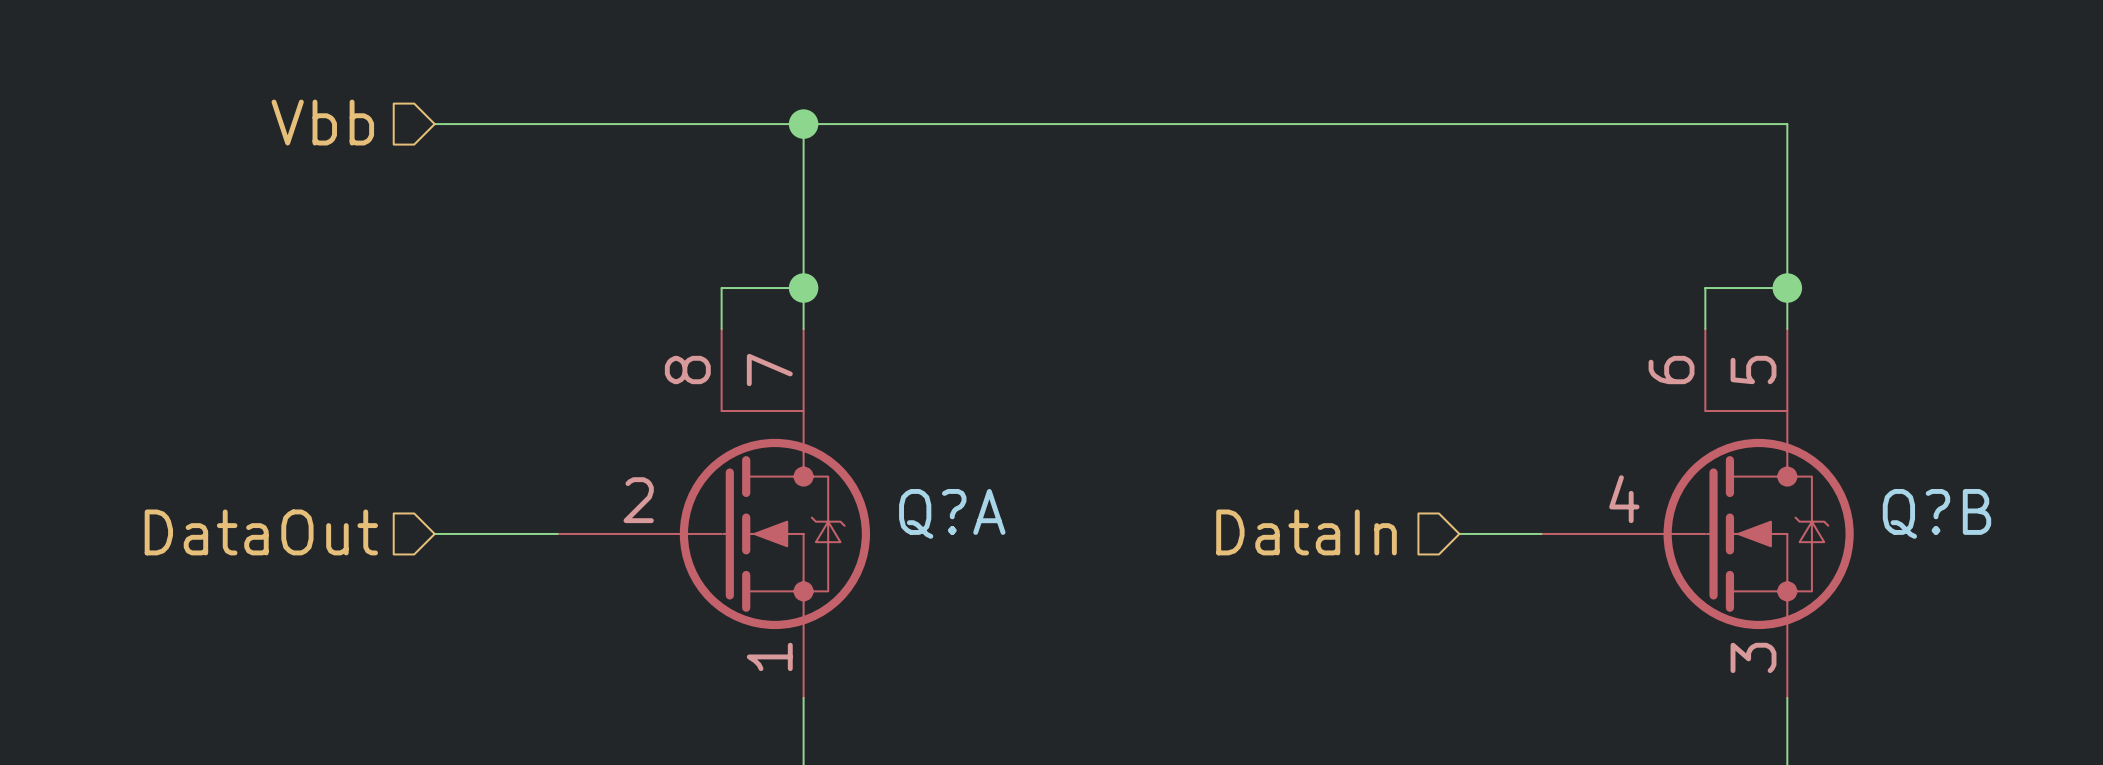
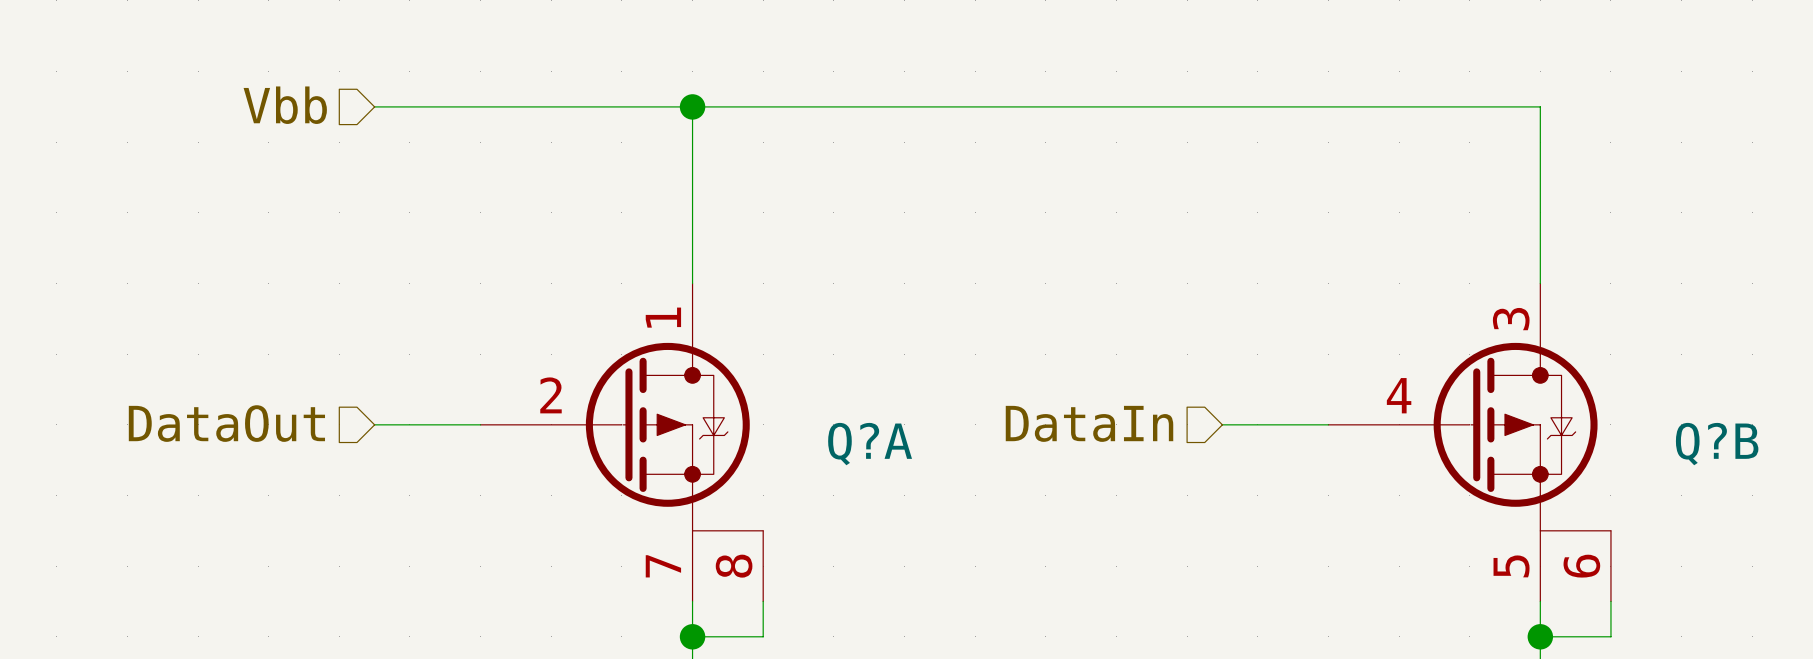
wire: (803, 288) (721, 288) (721, 329) -> none
junction: (803, 288) -> none
wire: (1787, 288) (1705, 288) (1705, 329) -> none
junction: (1787, 288) -> none
Q?A symbol: [557, 329, 871, 698] -> [480, 283, 764, 602]
Q?B symbol: [1541, 329, 1854, 698] -> [1328, 283, 1611, 602]
wire: none -> (1222, 424) (1328, 424)
hierarchical label position: DataOut (261, 532) -> DataOut (226, 423)
hierarchical label position: DataIn (1306, 532) -> DataIn (1089, 423)
wire: (434, 533) (557, 533) -> (374, 424) (480, 424)
wire: (1459, 533) (1541, 533) -> none
wire: none -> (763, 601) (763, 636) (692, 636)
wire: none -> (1610, 601) (1610, 636) (1540, 636)
junction: none -> (692, 636)
junction: none -> (1540, 636)

